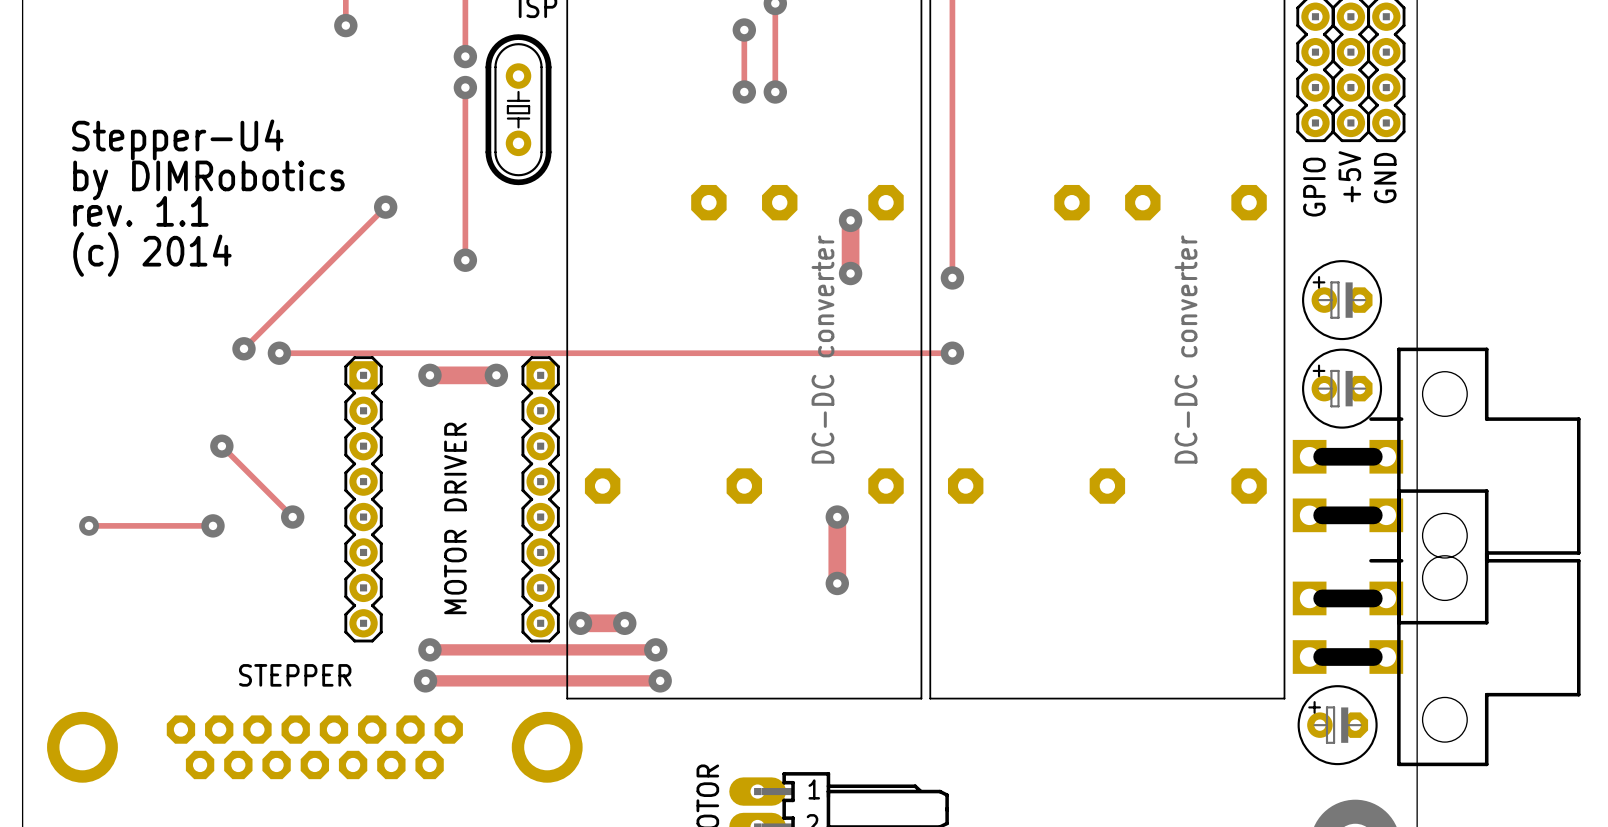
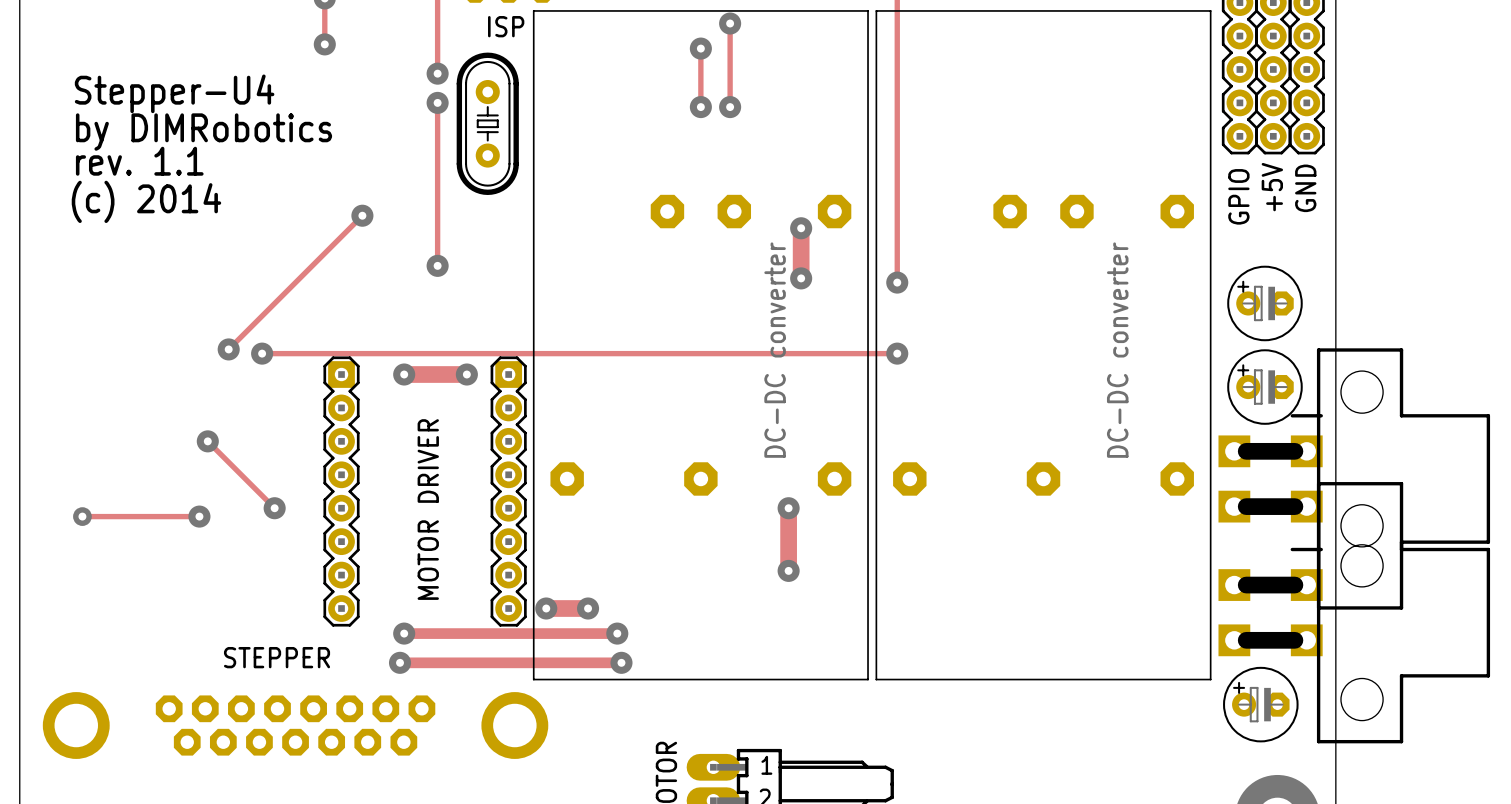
text position: Stepper-U4 (177, 139) -> Stepper-U4 (174, 93)
text position: by DIMRobotics (208, 180) -> by DIMRobotics (203, 132)
text position: rev. 1.1 (140, 211) -> rev. 1.1 (139, 161)
text position: (c) 2014 (152, 254) -> (c) 2014 (146, 201)

